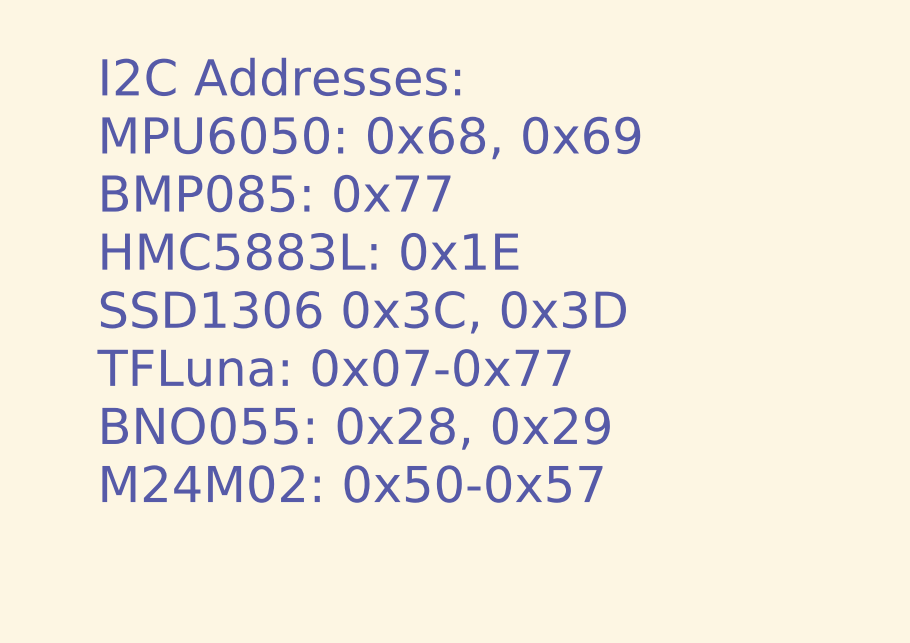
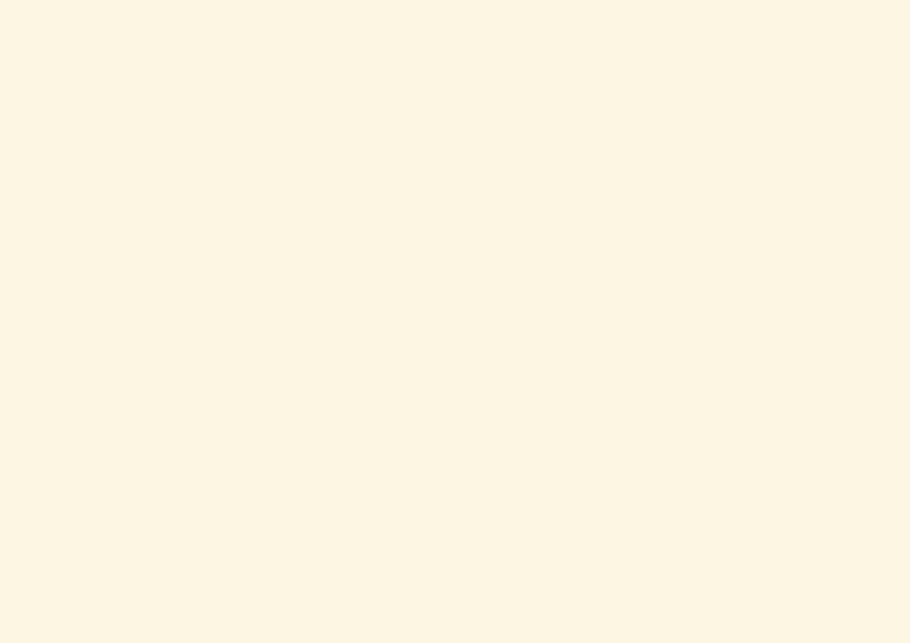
text: I2C Addresses: (281, 76) -> none
text: MPU6050: 0x68, 0x69 (371, 137) -> none
text: BMP085: 0x77 (276, 193) -> none
text: HMC5883L: 0x1E (310, 251) -> none
text: SSD1306 0x3C, 0x3D (363, 312) -> none
text: TFLuna: 0x07-0x77 (333, 367) -> none
text: BNO055: 0x28, 0x29 (356, 428) -> none
text: M24M02: 0x50-0x57 (352, 484) -> none

